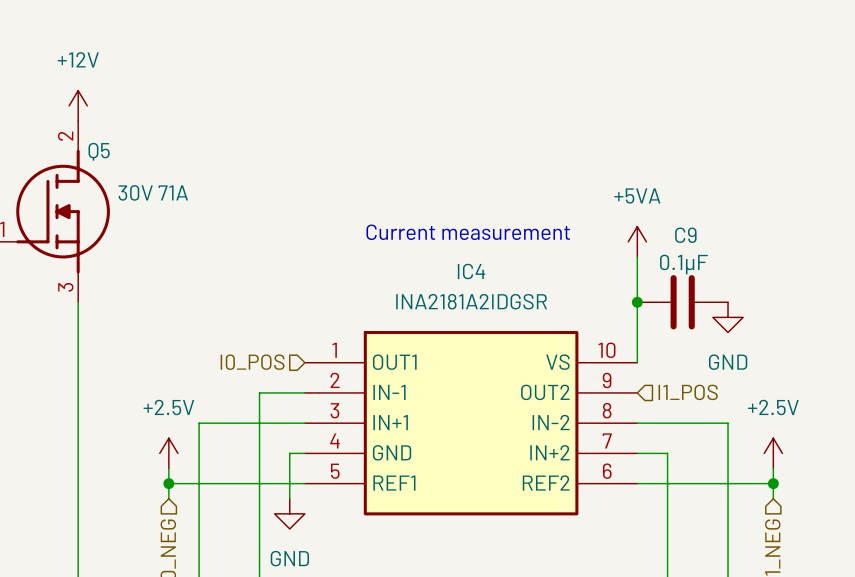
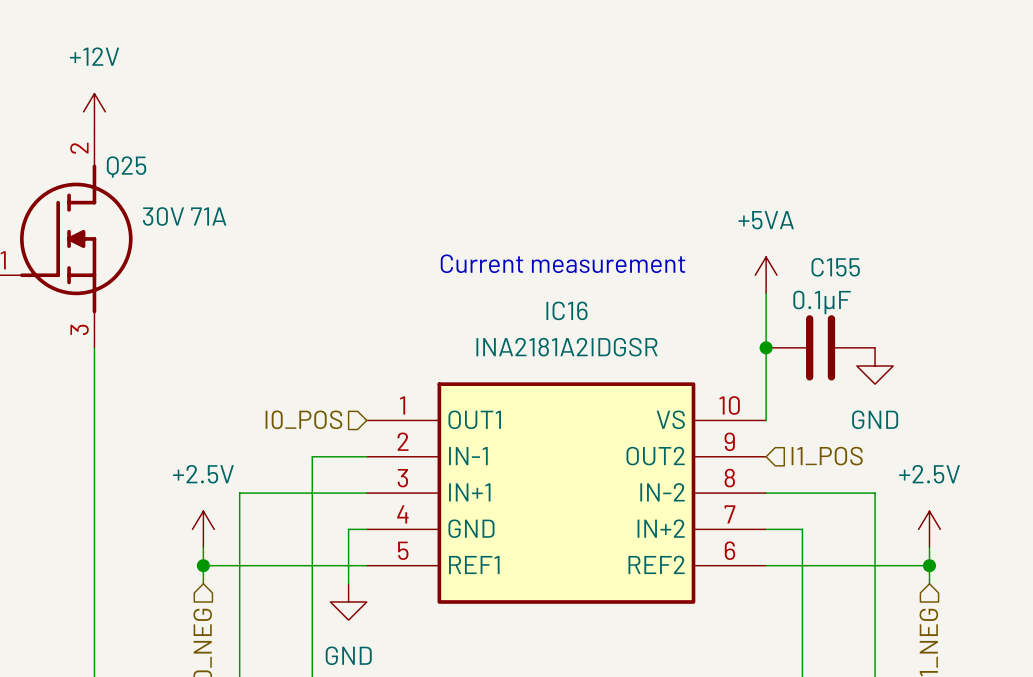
Q5 name: Q5 (99, 151) -> Q25 (126, 167)
C9 name: C9 (685, 235) -> C155 (835, 267)
IC4 name: IC4 (471, 271) -> IC16 (567, 310)

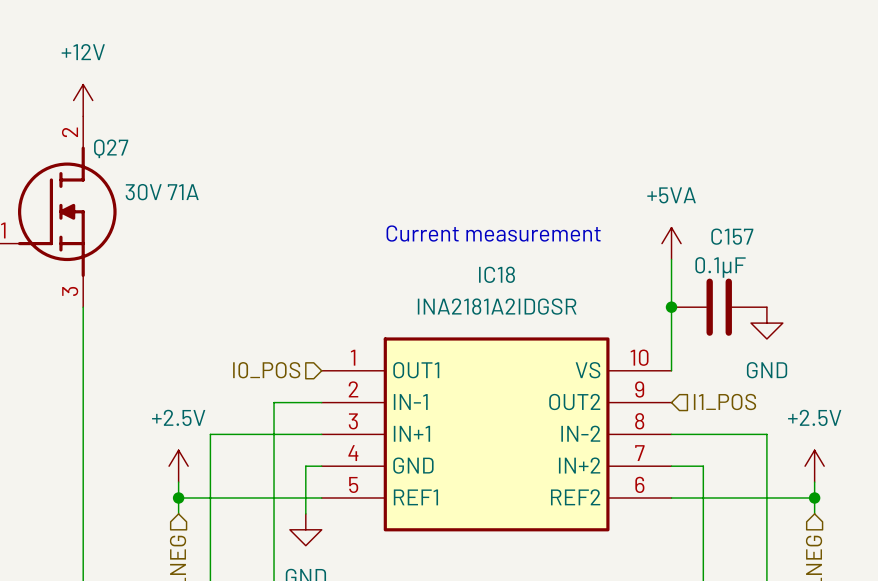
Q25 name: Q25 (126, 167) -> Q27 (111, 148)
C155 name: C155 (835, 267) -> C157 (732, 236)
IC16 name: IC16 (567, 310) -> IC18 (496, 274)

